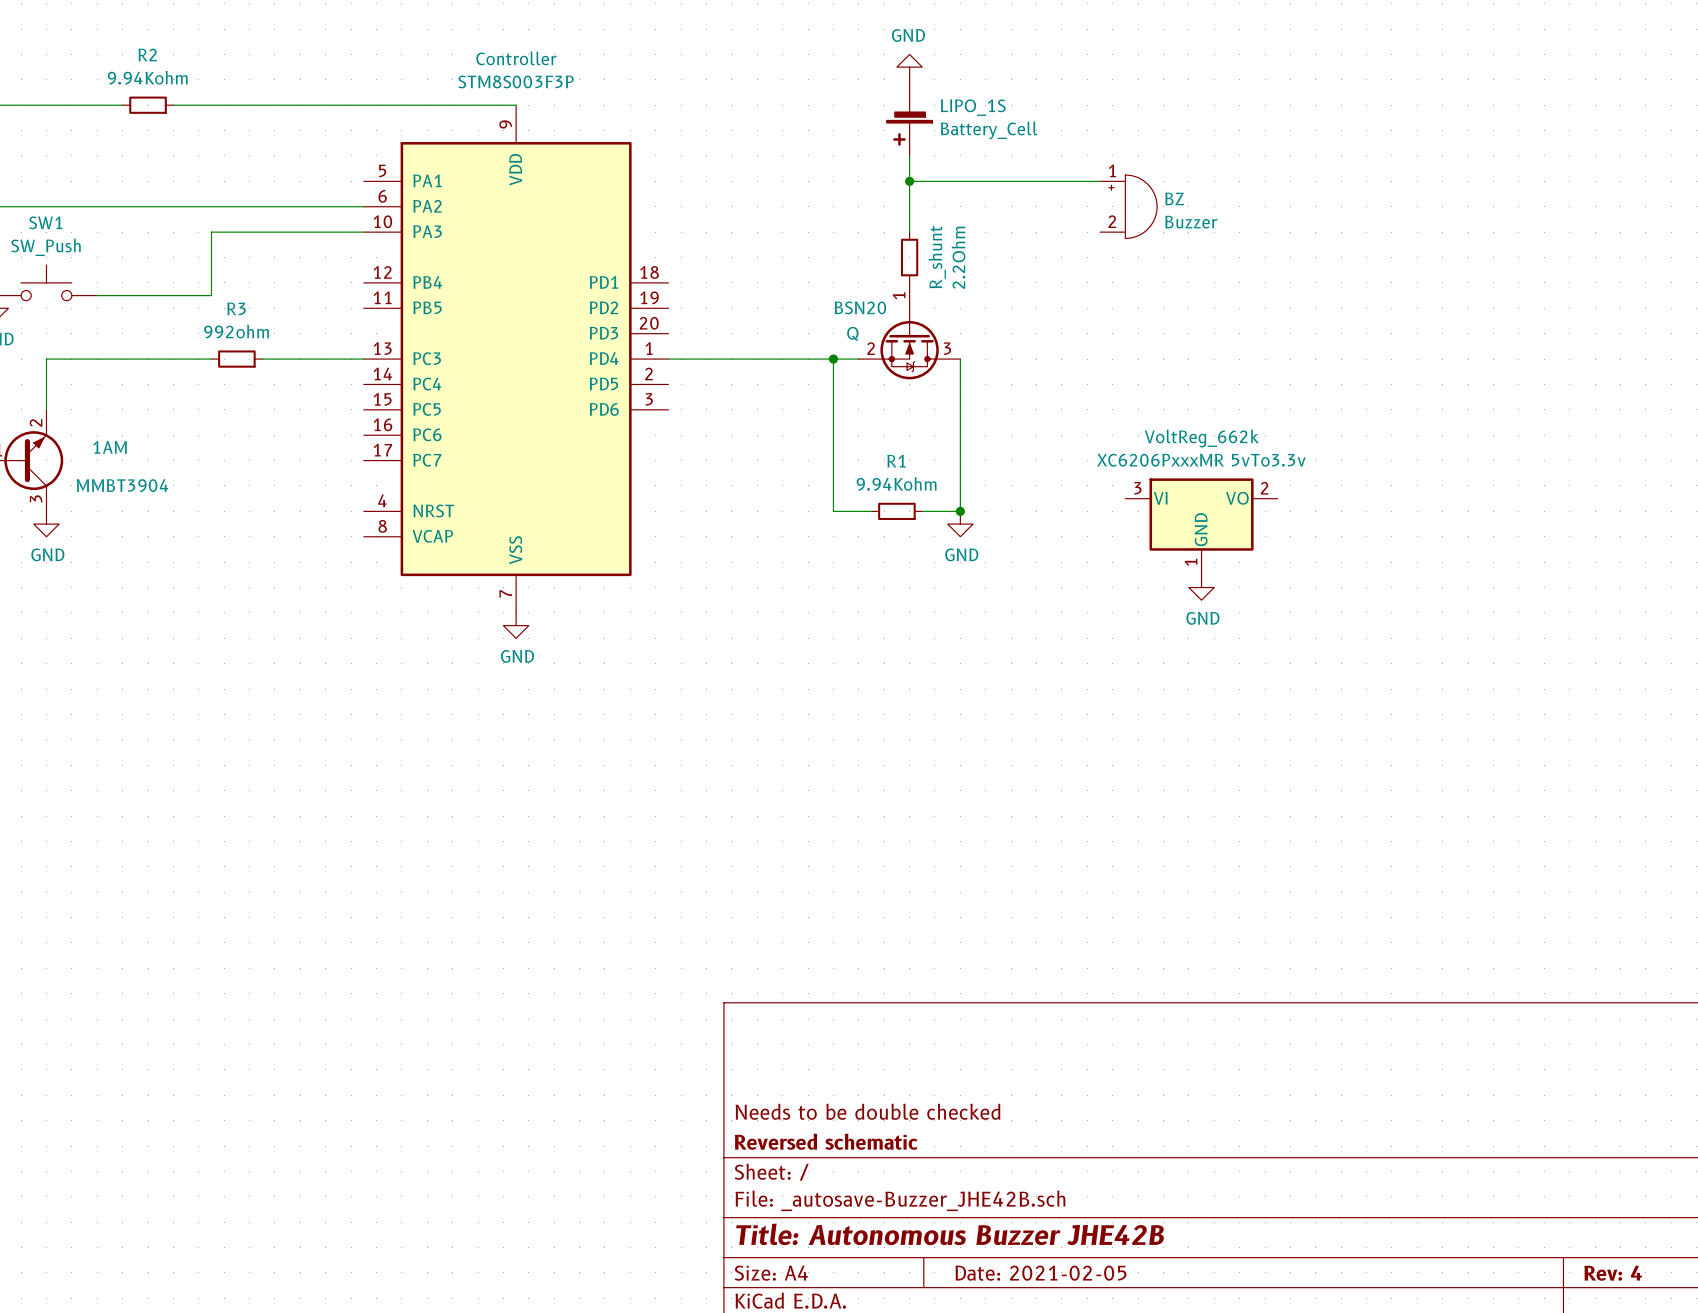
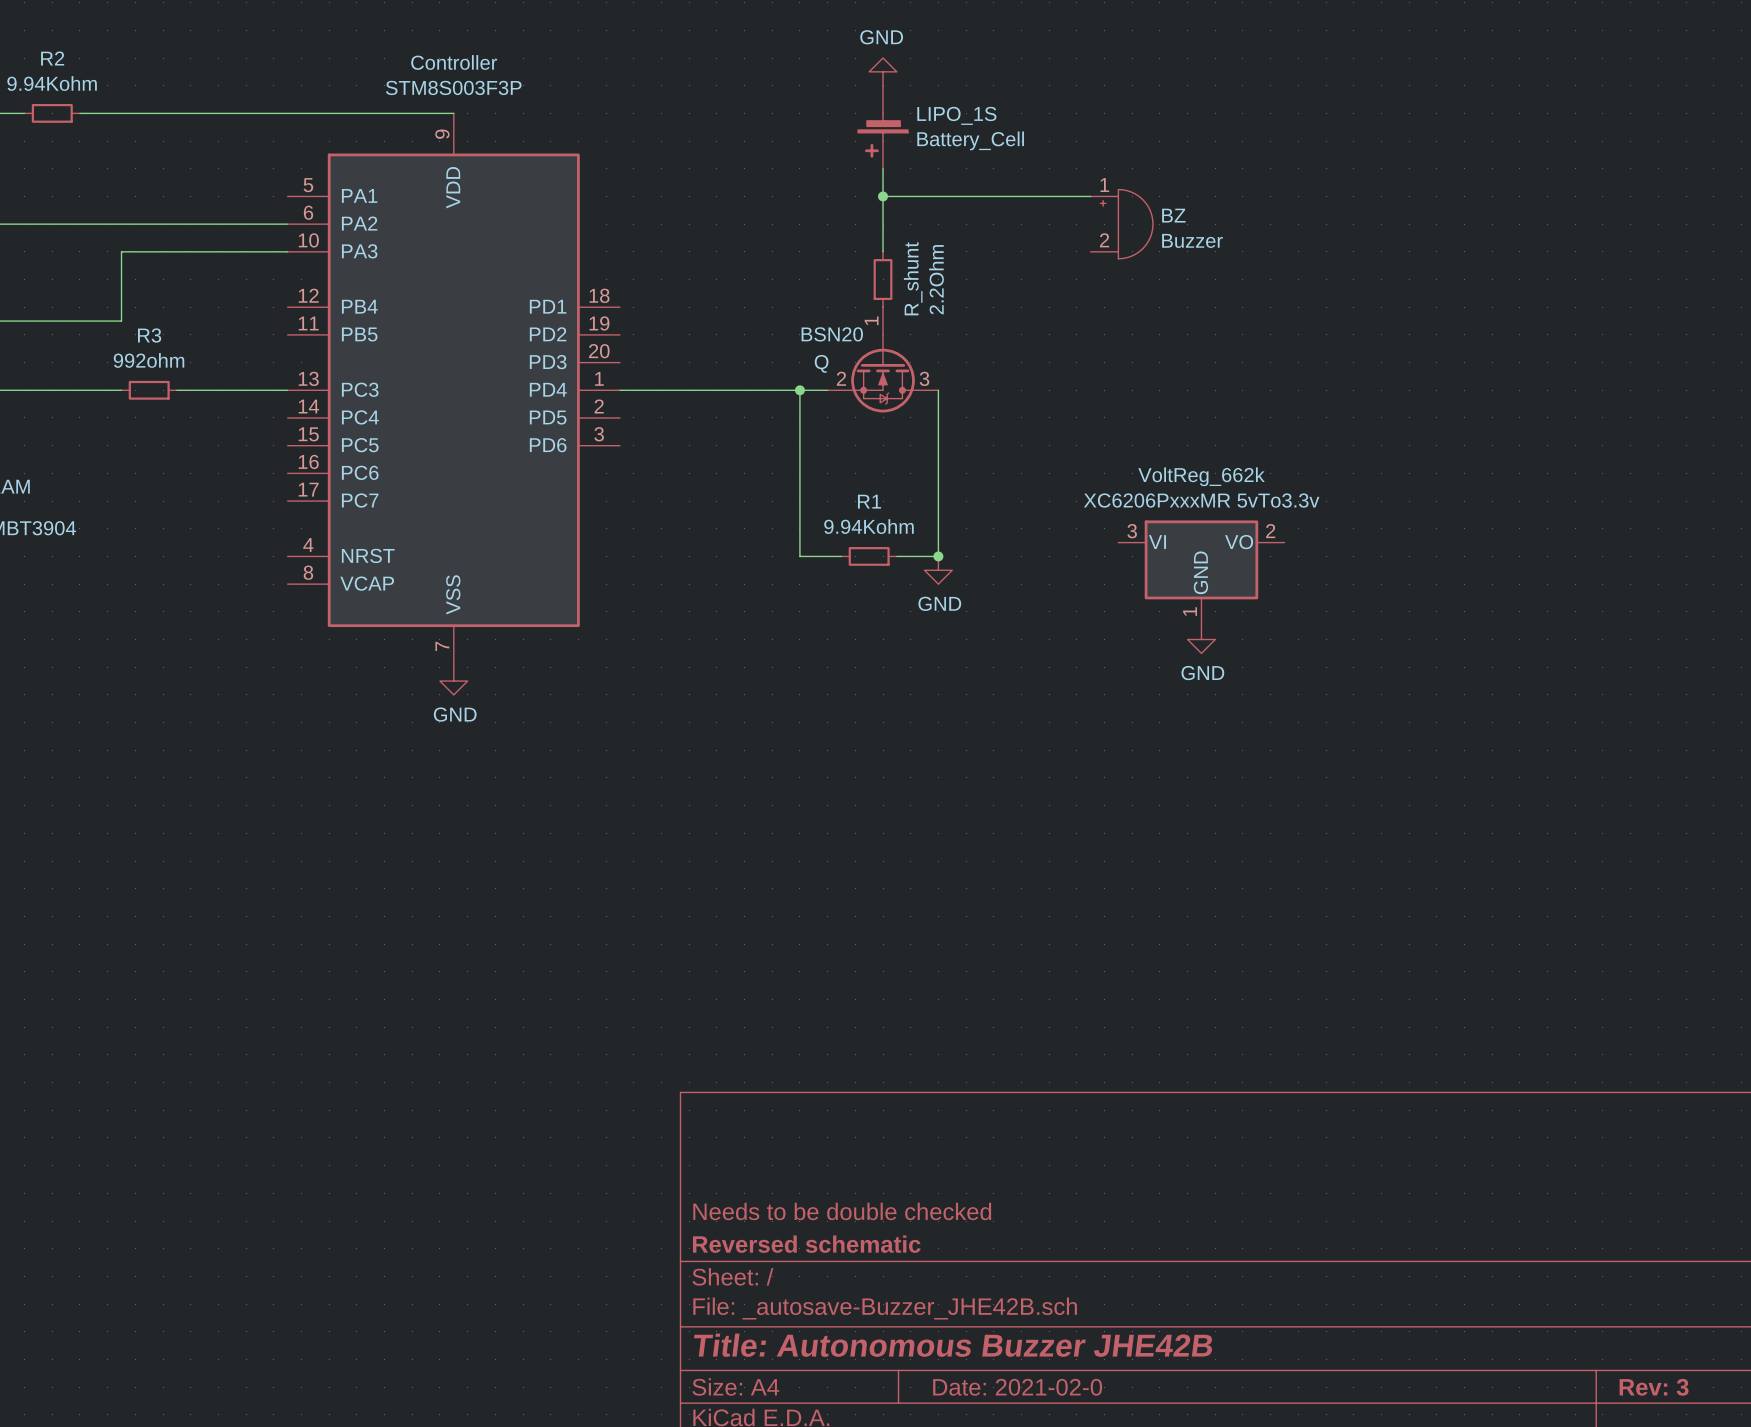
title block: Date: 2021-02-05 (1040, 1273) -> Date: 2021-02-0 (1017, 1387)
title block: Rev: 4 (1613, 1273) -> Rev: 3 (1654, 1387)

